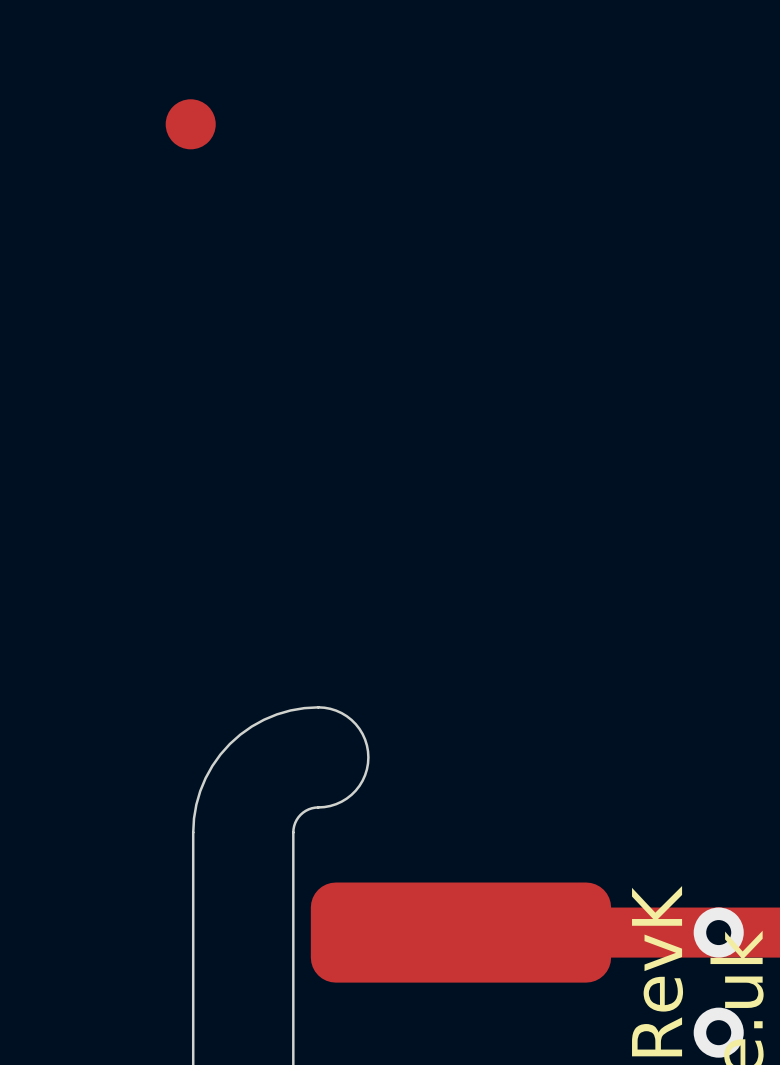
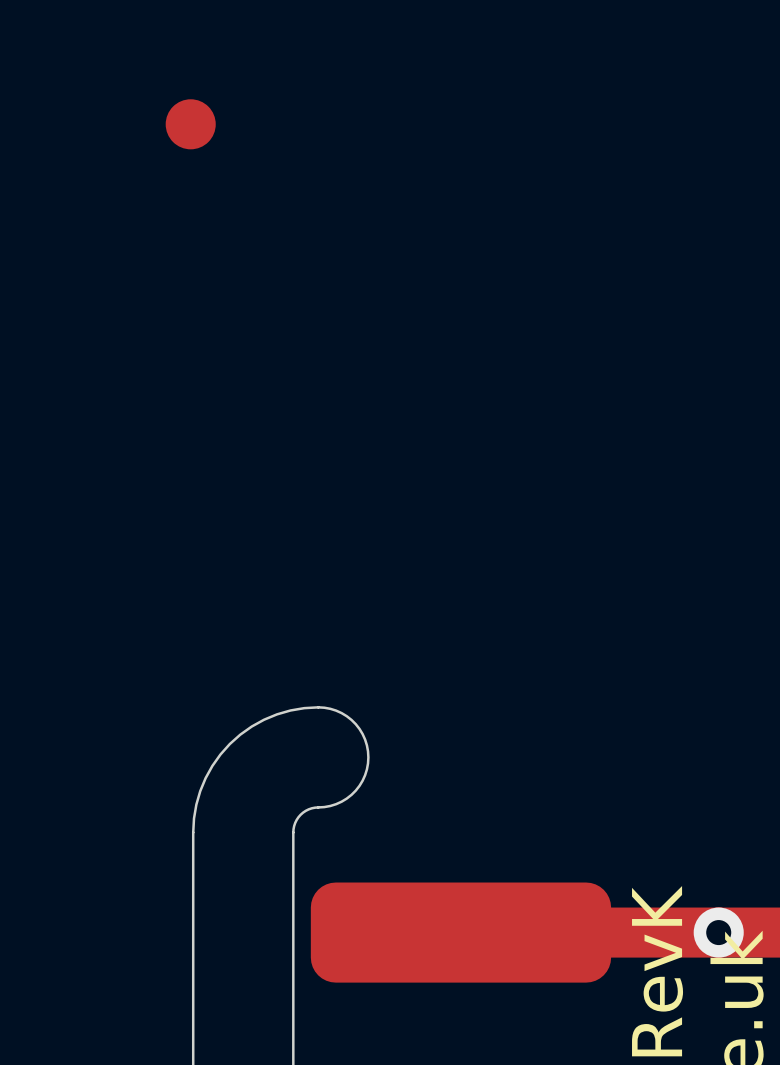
via: (718, 1032) -> none

